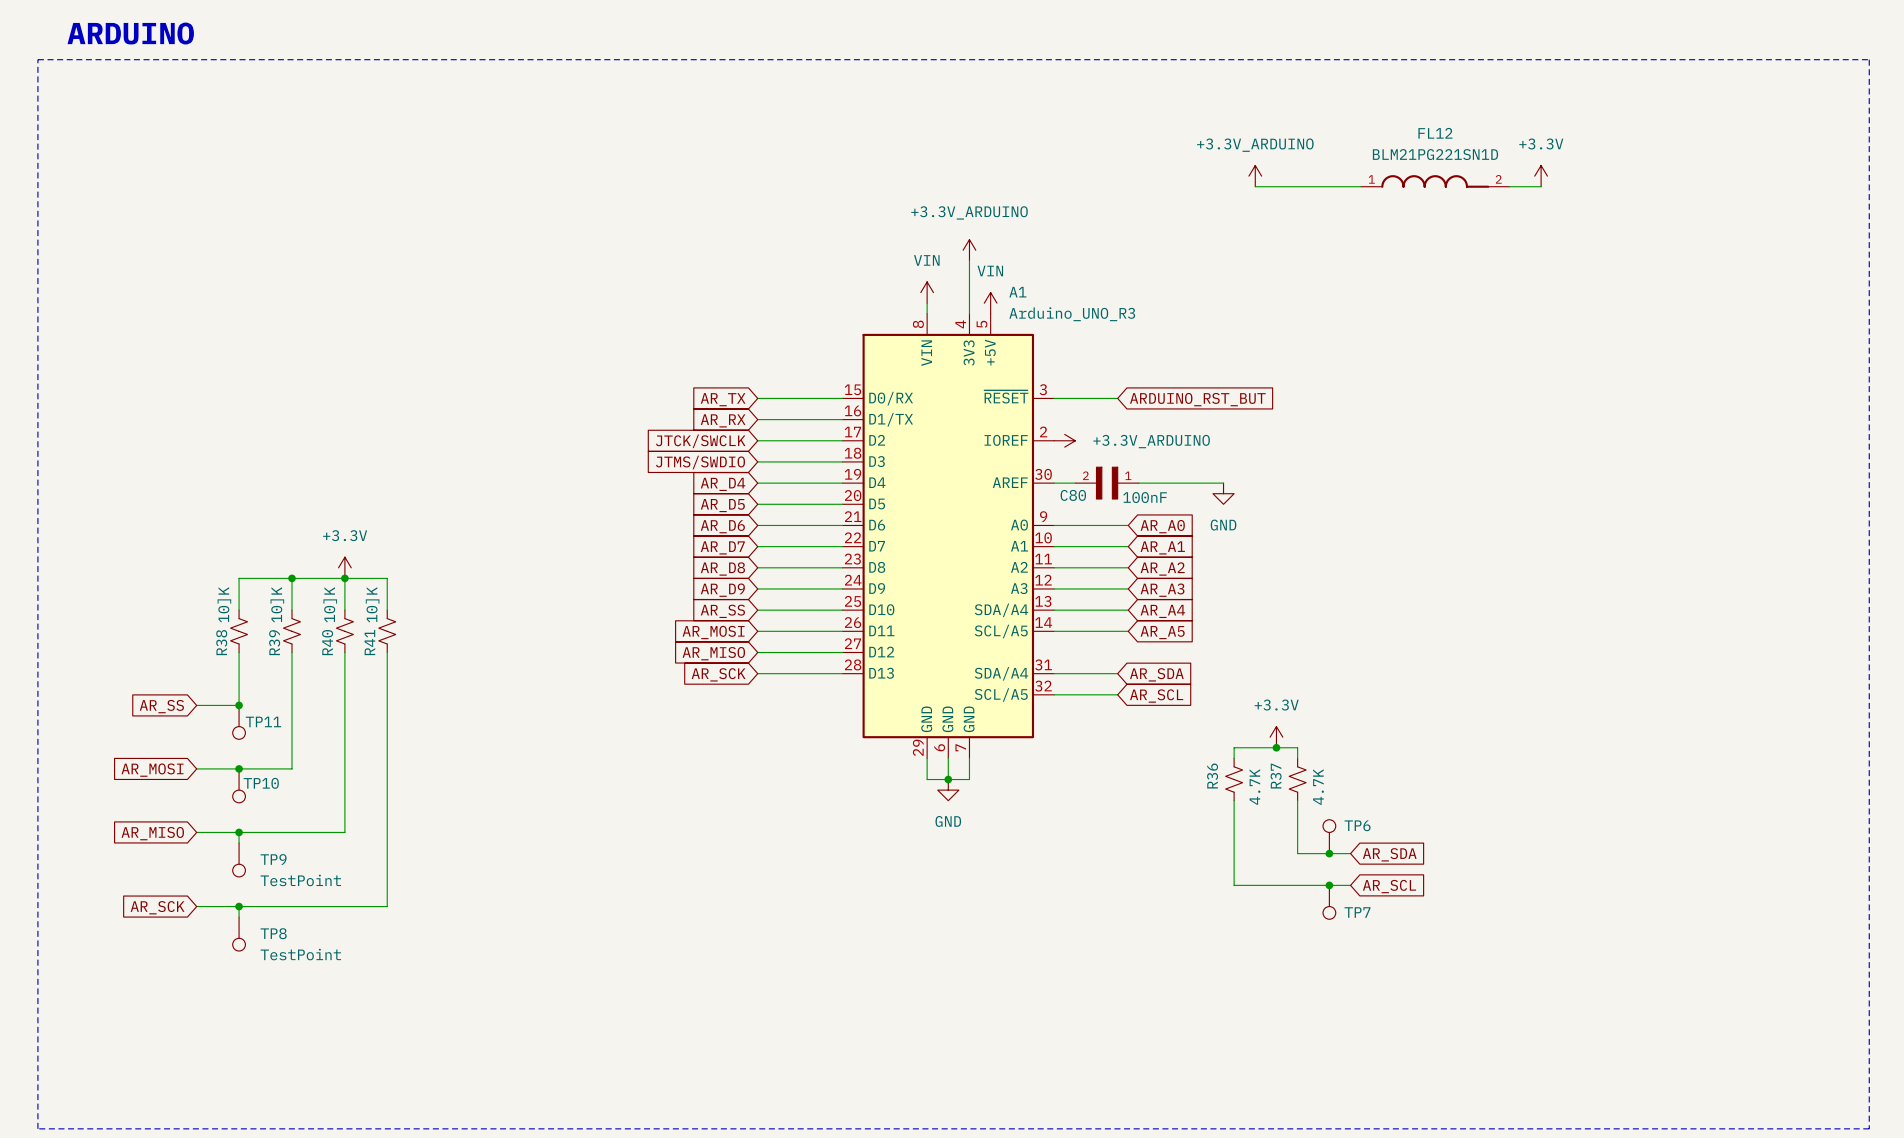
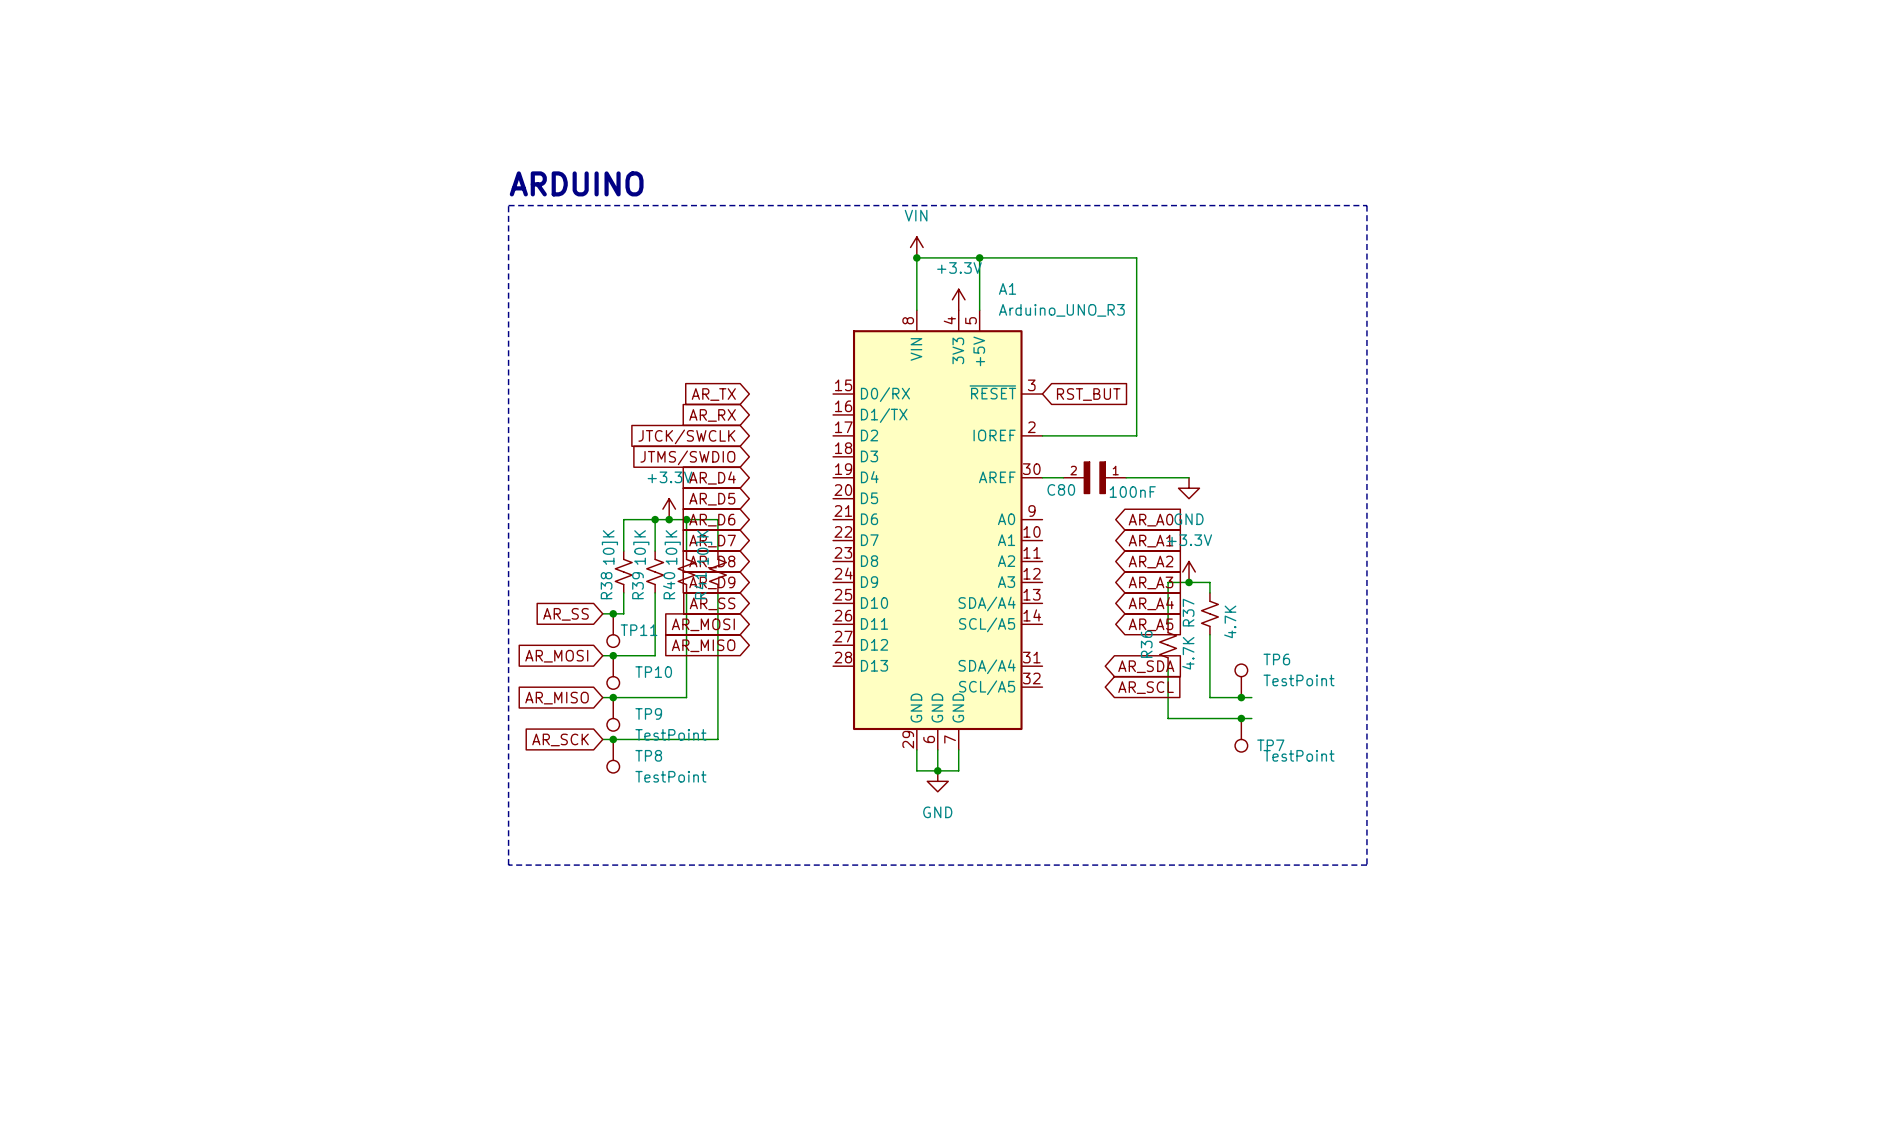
text: ARDUINO (130, 33) -> none
line: (37, 59) (1869, 59) (1869, 1128) (37, 1128) (37, 59) -> none
power symbol: +3.3V_ARDUINO (1255, 176) -> none
power symbol: +3.3V (1541, 176) -> none
FL12: BLM21PG221SN1D (1435, 181) -> none
text: none -> ARDUINO (576, 183)
wire: (1255, 186) (1361, 186) -> none
wire: (1509, 186) (1541, 186) -> none
line: none -> (508, 205) (1366, 205) (1366, 865) (508, 865) (508, 205)
power symbol: none -> VIN (916, 247)
power symbol: +3.3V_ARDUINO (969, 250) -> none
junction: none -> (916, 257)
wire: (969, 260) (969, 313) -> (979, 257) (979, 310)
junction: none -> (979, 257)
power symbol: VIN (927, 292) -> none
wire: none -> (916, 299) (916, 257) (1136, 257) (1136, 435) (1042, 435)
power symbol: none -> +3.3V (958, 299)
power symbol: VIN (990, 303) -> none
wire: (757, 398) (842, 398) -> none
wire: (1054, 398) (1117, 398) -> none
global label: ARDUINO_RST_BUT (1197, 399) -> RST_BUT (1088, 394)
wire: (757, 419) (842, 419) -> none
wire: (757, 440) (842, 440) -> none
power symbol: +3.3V_ARDUINO (1064, 440) -> none
wire: (757, 461) (842, 461) -> none
wire: (757, 483) (842, 483) -> none
wire: (1202, 483) (1223, 483) -> none
power symbol position: GND (1223, 493) -> GND (1189, 488)
wire: (757, 504) (842, 504) -> none
power symbol: none -> +3.3V (669, 509)
wire: none -> (655, 519) (655, 551)
junction: none -> (655, 519)
junction: none -> (669, 519)
wire: none -> (686, 519) (686, 551)
junction: none -> (686, 519)
wire: (757, 525) (842, 525) -> none
wire: (1054, 525) (1128, 525) -> none
wire: (757, 546) (842, 546) -> none
wire: (1054, 546) (1128, 546) -> none
wire: none -> (623, 551) (623, 519) (717, 519) (717, 551)
power symbol: +3.3V (344, 567) -> none
wire: (757, 567) (842, 567) -> none
wire: (1054, 567) (1128, 567) -> none
wire: (291, 578) (291, 610) -> none
junction: (291, 578) -> none
wire: (344, 578) (344, 610) -> none
junction: (344, 578) -> none
wire: (757, 588) (842, 588) -> none
wire: (1054, 588) (1128, 588) -> none
junction: none -> (1189, 582)
wire: none -> (623, 592) (623, 613) (602, 613)
wire: none -> (655, 592) (655, 655) (602, 655)
wire: none -> (686, 592) (686, 697) (602, 697)
wire: none -> (717, 592) (717, 739) (602, 739)
wire: none -> (1209, 592) (1209, 582) (1168, 582) (1168, 624)
wire: (239, 610) (239, 578) (387, 578) (387, 610) -> none
wire: (757, 610) (842, 610) -> none
wire: (1054, 610) (1128, 610) -> none
junction: none -> (613, 613)
global label: none -> AR_SS (566, 614)
R38 position: (239, 631) -> (623, 571)
R39 position: (291, 631) -> (655, 571)
R40 position: (344, 631) -> (686, 571)
R41 position: (387, 631) -> (717, 571)
wire: (757, 631) (842, 631) -> none
wire: (1054, 631) (1128, 631) -> none
wire: none -> (1209, 634) (1209, 697) (1251, 697)
wire: (239, 652) (239, 705) (196, 705) -> none
wire: (291, 652) (291, 768) (196, 768) -> none
wire: (344, 652) (344, 832) (196, 832) -> none
wire: (387, 652) (387, 906) (196, 906) -> none
wire: (757, 652) (842, 652) -> none
junction: none -> (613, 655)
global label: none -> AR_MOSI (556, 656)
wire: (757, 673) (842, 673) -> none
wire: (1054, 673) (1117, 673) -> none
wire: none -> (1168, 666) (1168, 718) (1251, 718)
global label position: AR_SCK (718, 674) -> AR_SCK (560, 739)
TP6 value: none -> TestPoint (1299, 680)
wire: (1054, 694) (1117, 694) -> none
junction: (239, 705) -> none
junction: none -> (613, 697)
junction: none -> (1241, 697)
global label: AR_SS (161, 706) -> none
global label: none -> AR_MISO (557, 698)
TP11 position: (239, 722) -> (613, 630)
junction: none -> (1241, 718)
power symbol position: +3.3V (1276, 737) -> +3.3V (1189, 571)
junction: none -> (613, 739)
junction: (1276, 747) -> none
wire: (1234, 758) (1234, 747) (1297, 747) (1297, 758) -> none
TP7 value: none -> TestPoint (1299, 755)
junction: (239, 768) -> none
global label: AR_MOSI (152, 770) -> none
R36 position: (1234, 779) -> (1168, 645)
R37 position: (1297, 779) -> (1209, 613)
TP10 name position: TP10 (261, 783) -> TP10 (653, 672)
TP10 position: (239, 785) -> (613, 672)
wire: (1234, 800) (1234, 885) (1350, 885) -> none
wire: (1297, 800) (1297, 853) (1350, 853) -> none
TP6 name position: TP6 (1357, 825) -> TP6 (1276, 659)
wire: (239, 832) (239, 843) -> none
junction: (239, 832) -> none
global label: AR_MISO (152, 833) -> none
TP6 position: (1329, 836) -> (1241, 680)
junction: (1329, 853) -> none
global label: AR_SDA (1389, 854) -> none
TP9 position: (239, 859) -> (613, 714)
junction: (1329, 885) -> none
global label: AR_SCL (1389, 886) -> none
TP7 position: (1329, 902) -> (1241, 735)
wire: (239, 906) (239, 917) -> none
junction: (239, 906) -> none
global label: AR_SCK (157, 907) -> none
TP8 position: (239, 934) -> (613, 756)

